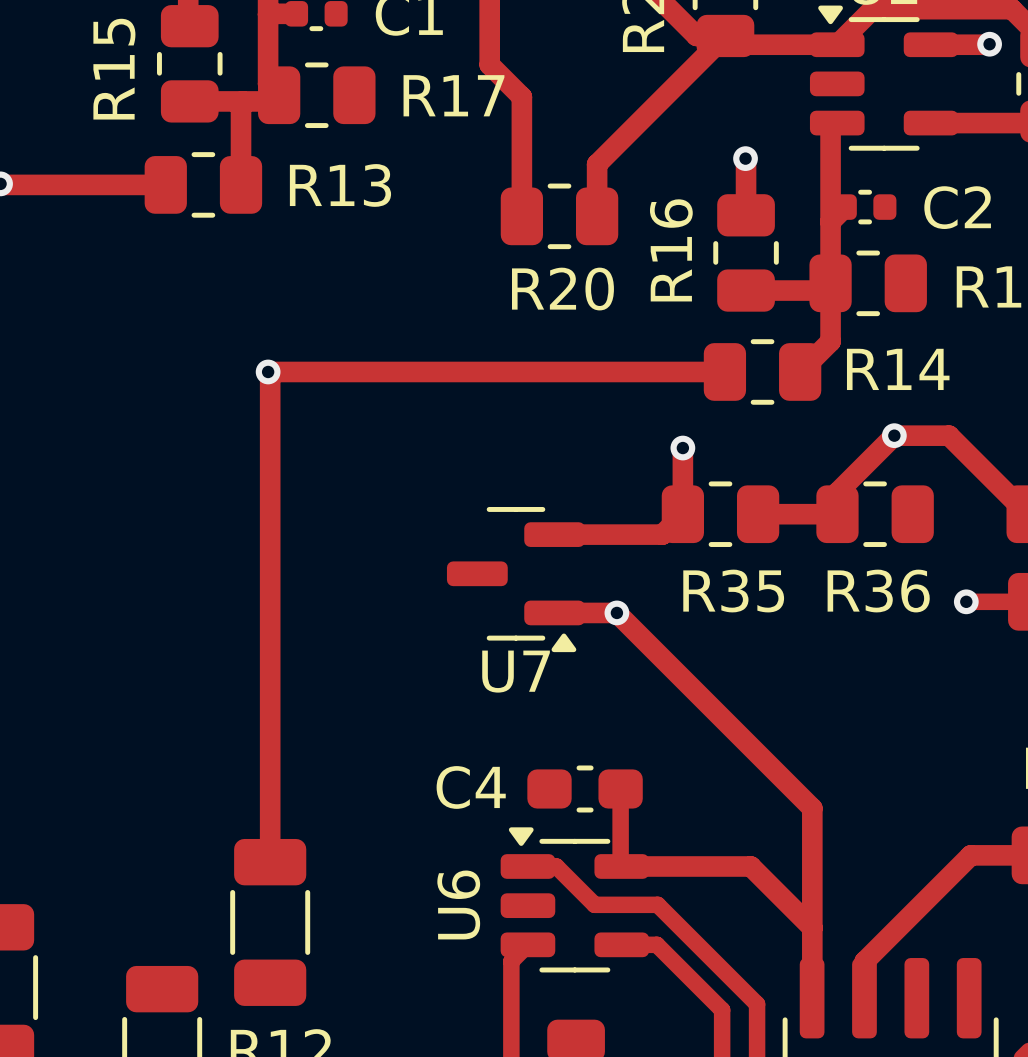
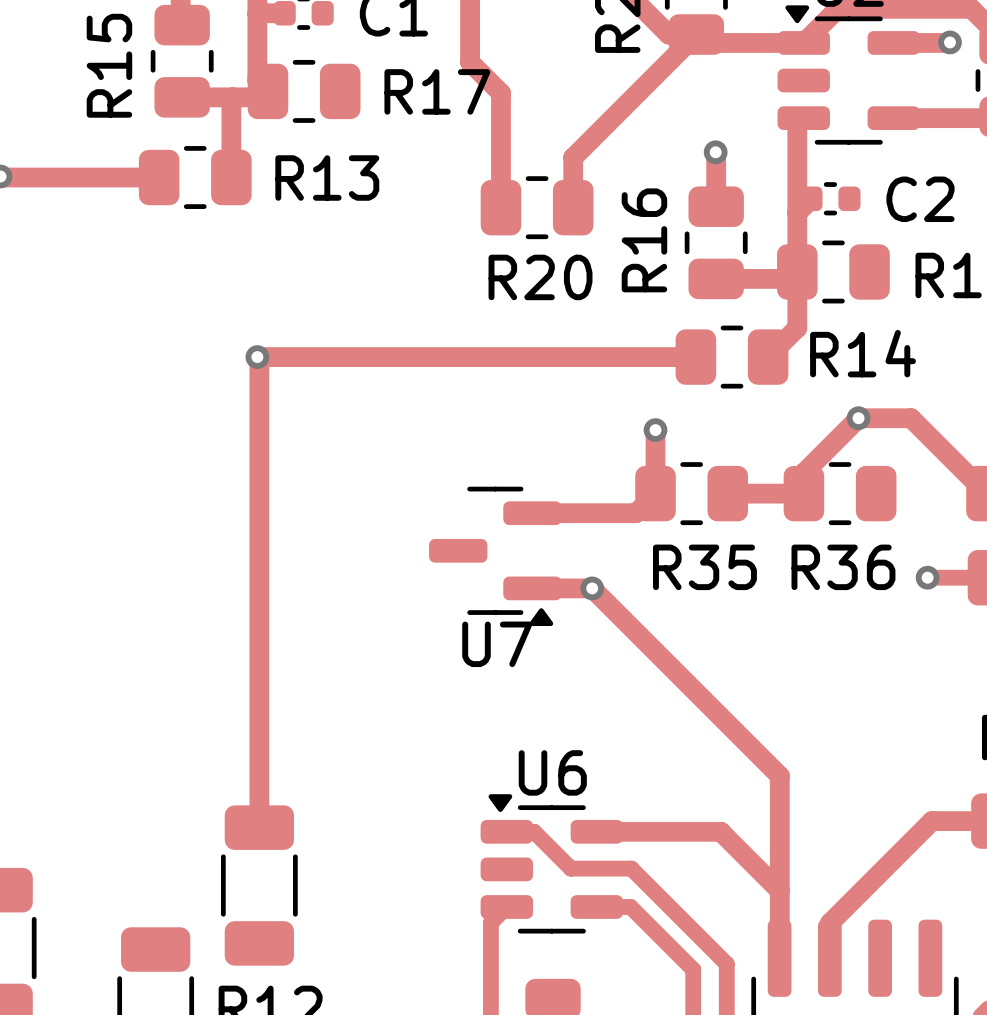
C4: (585, 788) -> none
track: (620, 788) (621, 866) -> none
U6 name rotation: 0° (458, 904) -> 90° clockwise (552, 772)
U6 name position: U6 (458, 904) -> U6 (552, 772)

